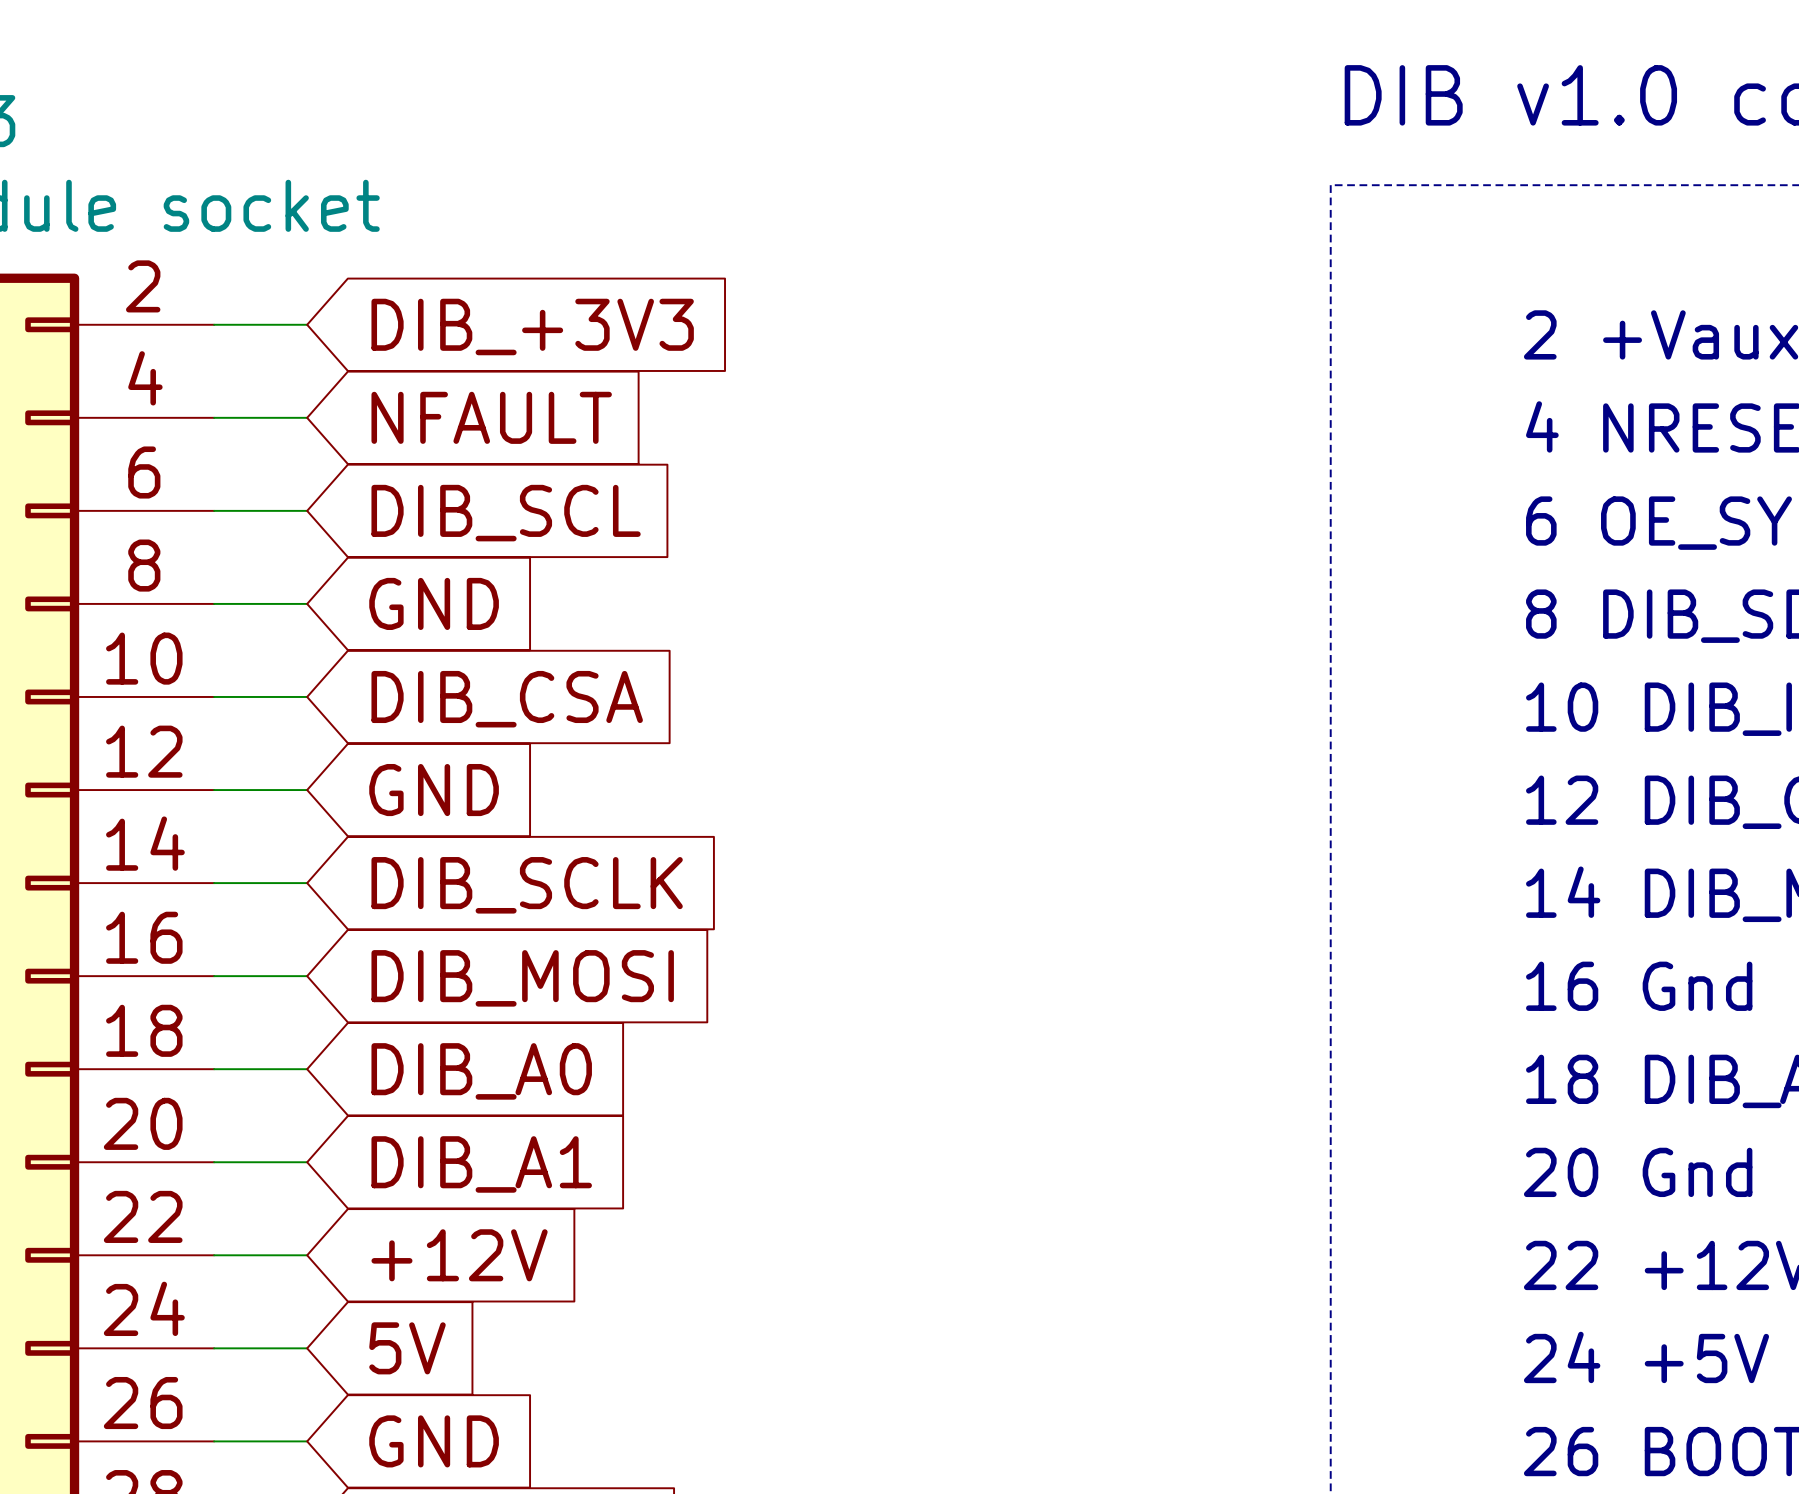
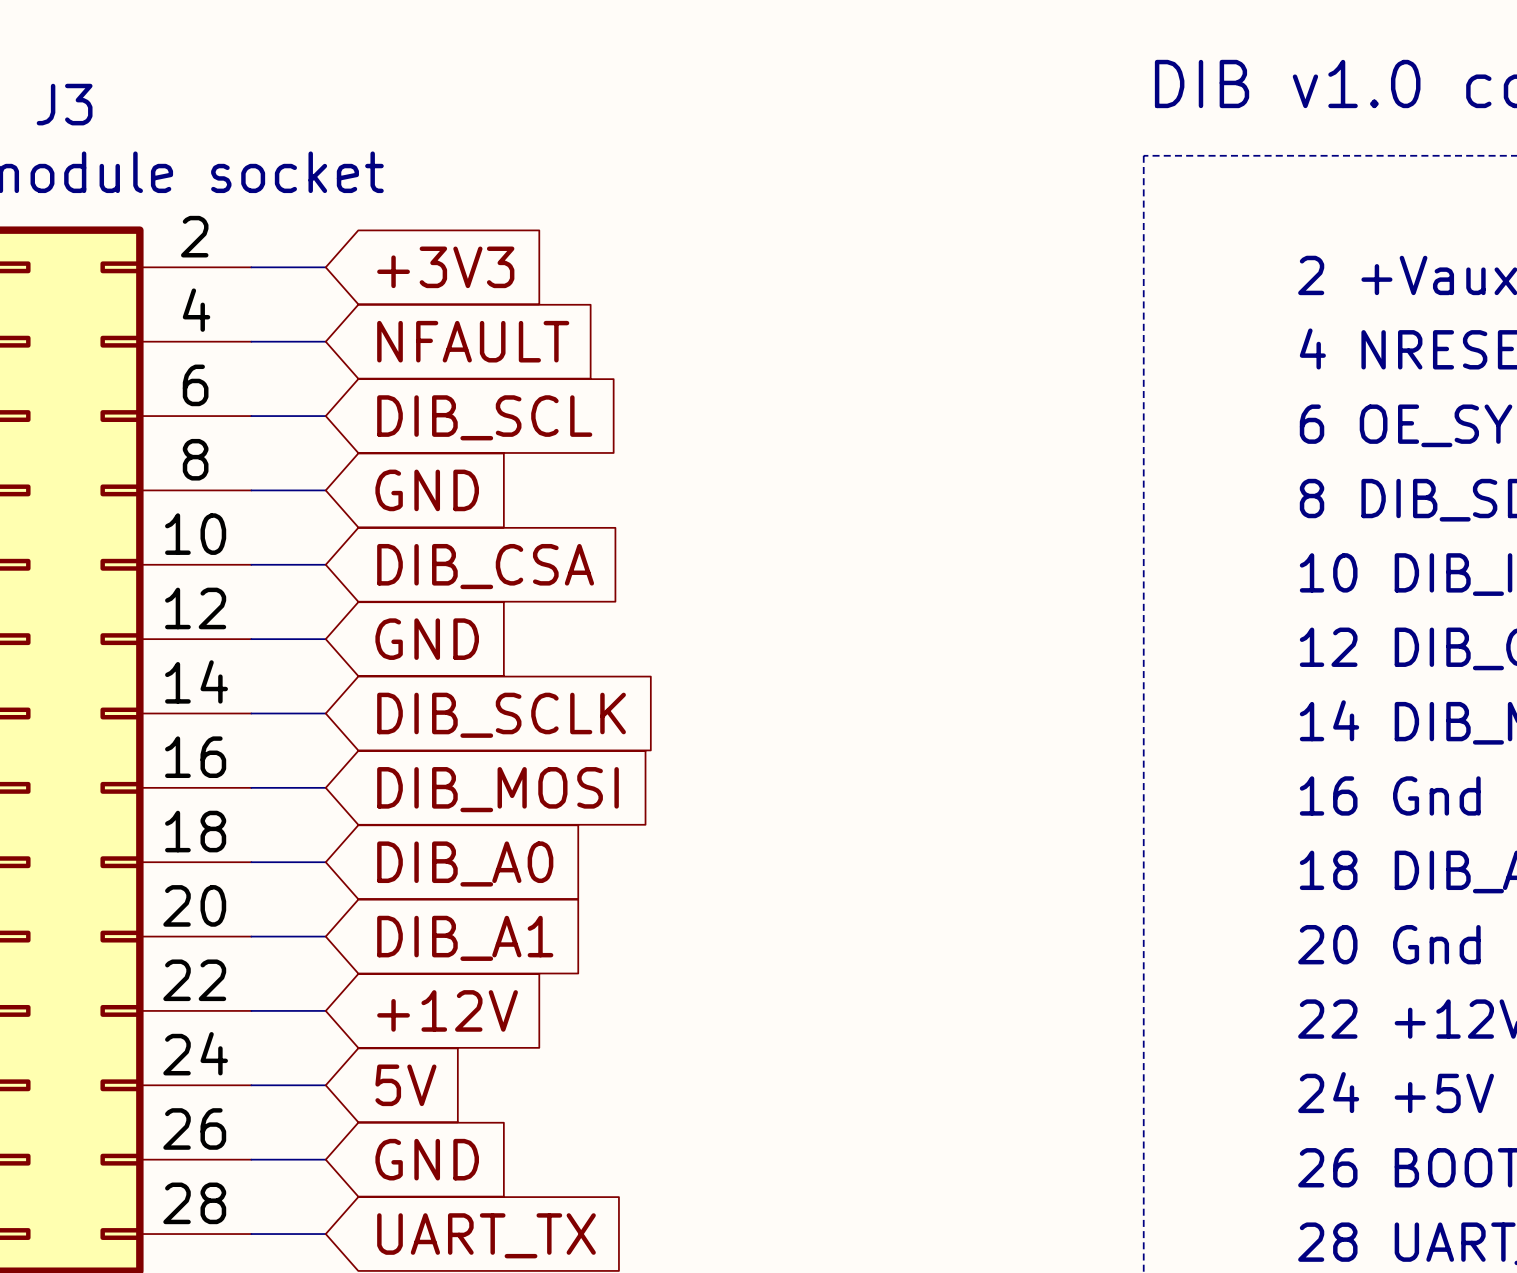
global label: DIB_+3V3 (532, 326) -> +3V3 (445, 267)

